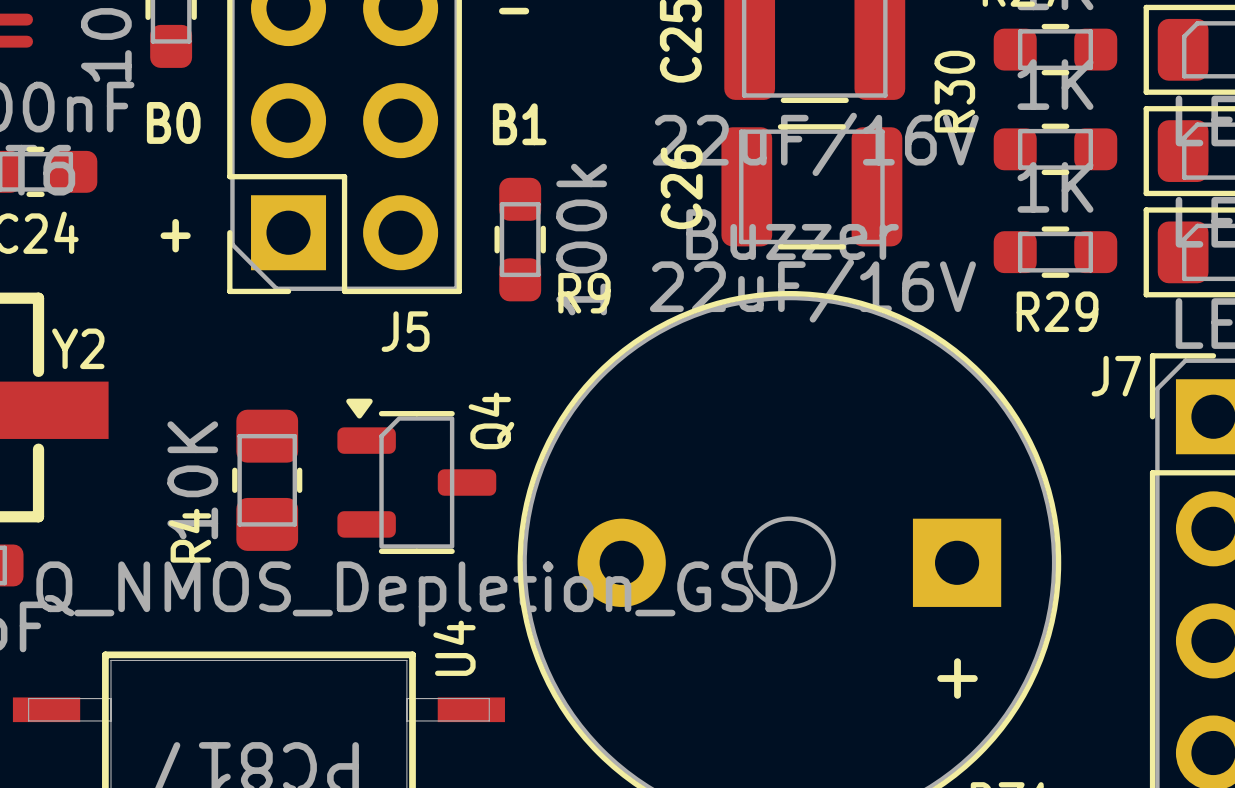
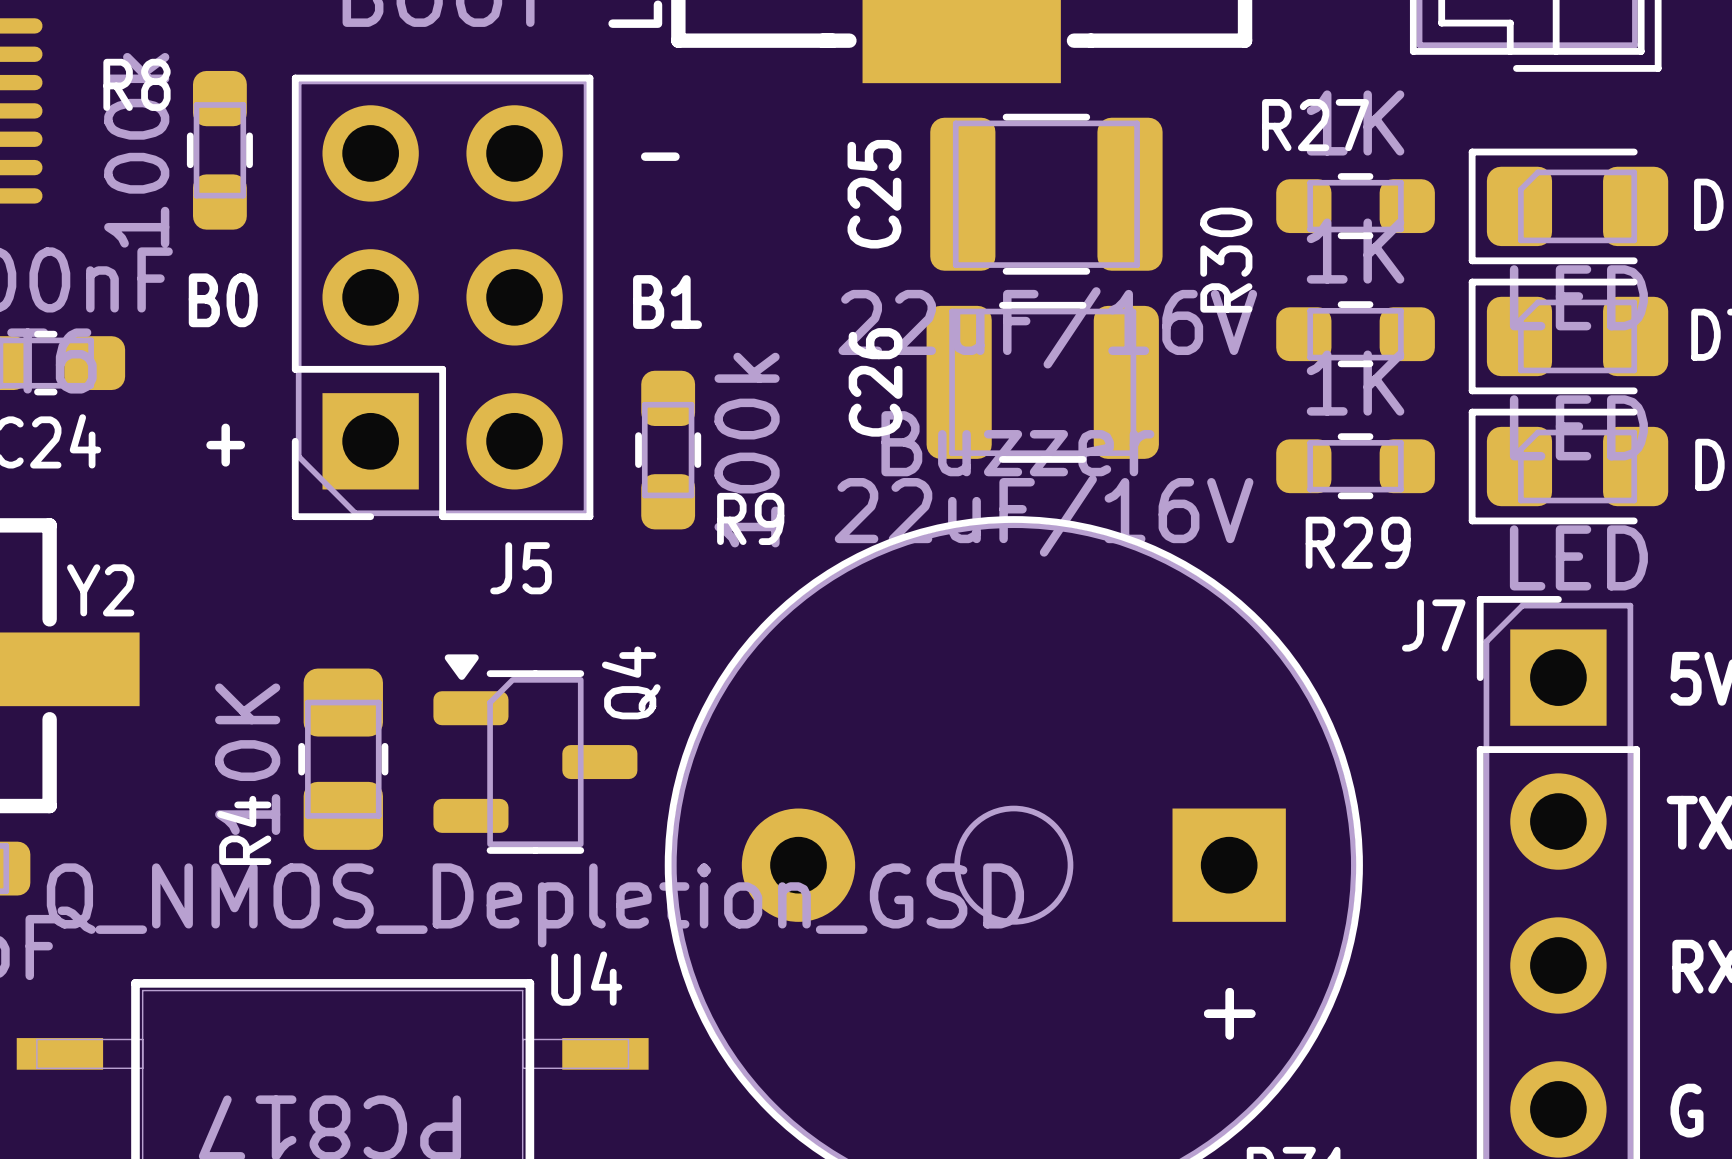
U4 name rotation: 0° (454, 648) -> 90° clockwise (586, 978)

